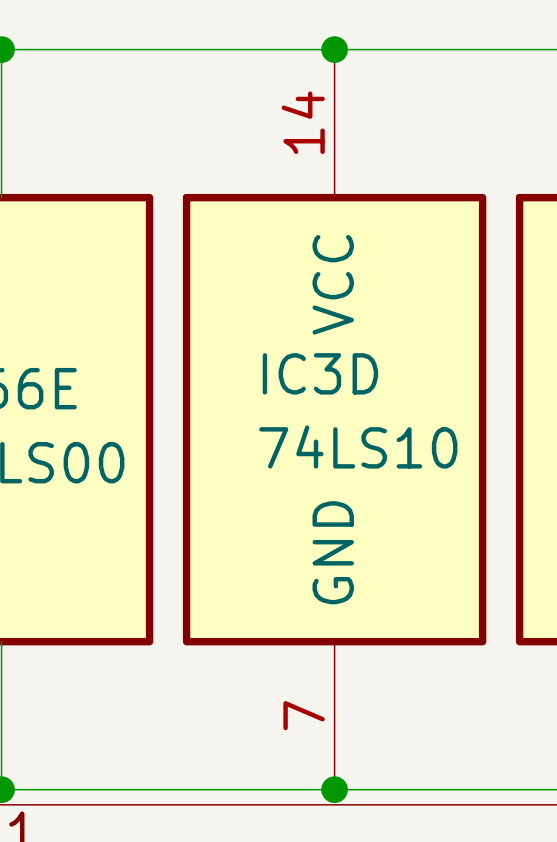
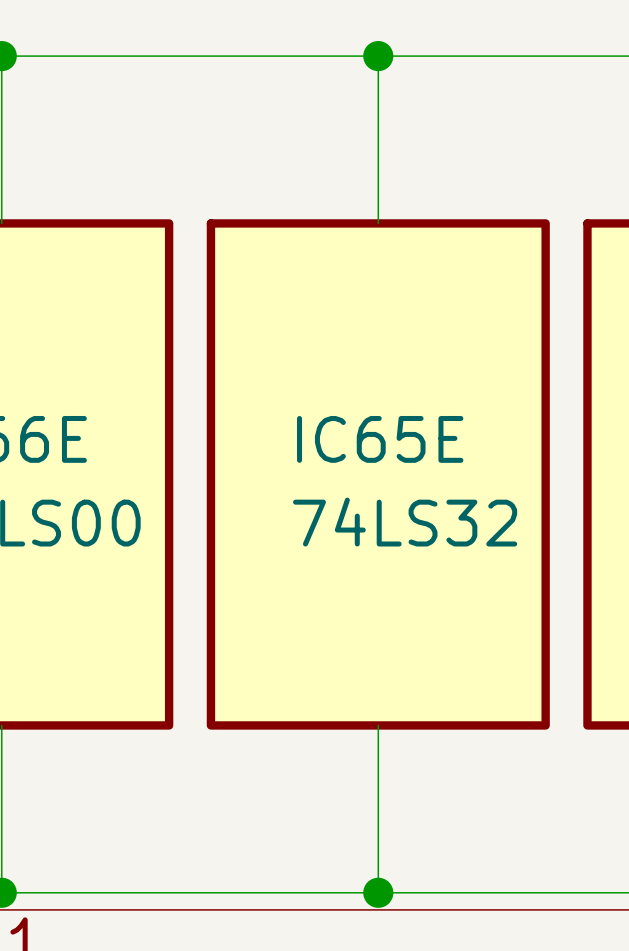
IC3D: 74LS10 (334, 419) -> none
IC65E: none -> 74LS32 (378, 474)

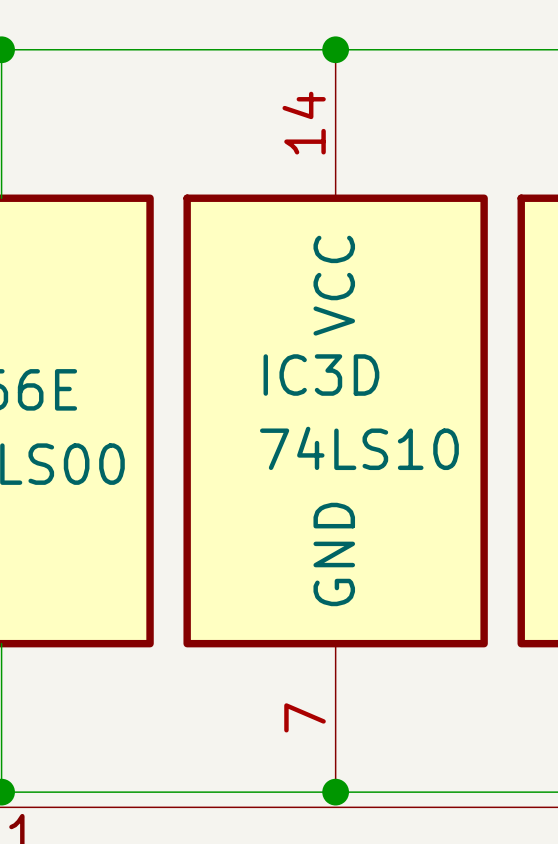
IC65E: 74LS32 (378, 474) -> none
IC3D: none -> 74LS10 (335, 420)

